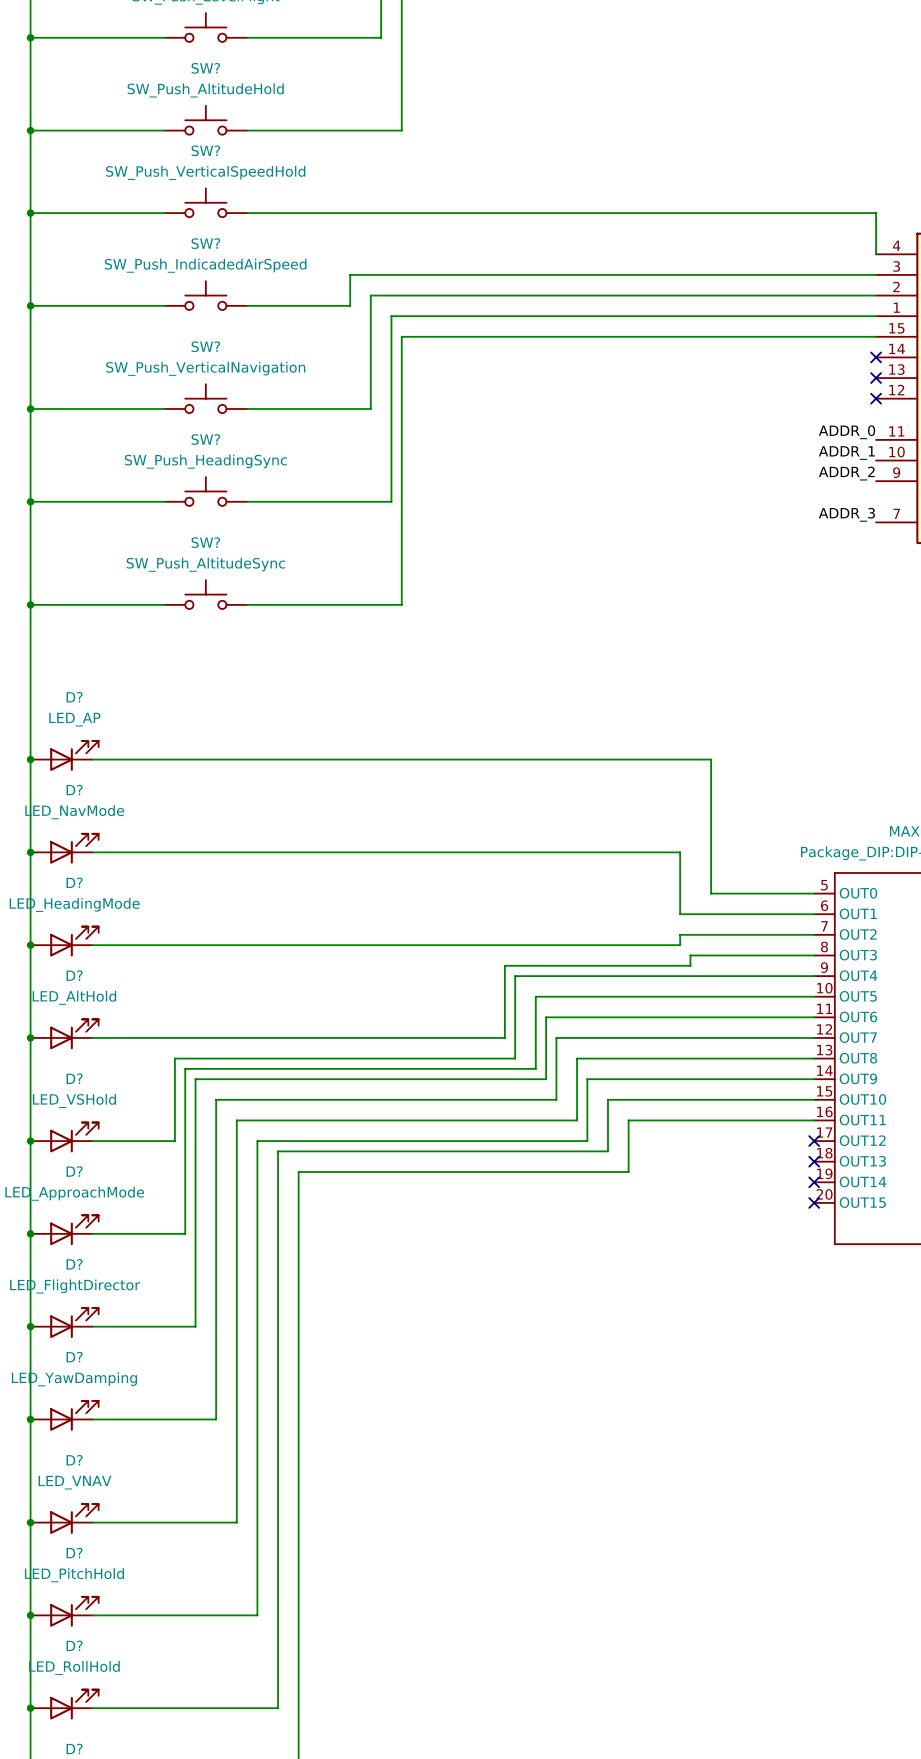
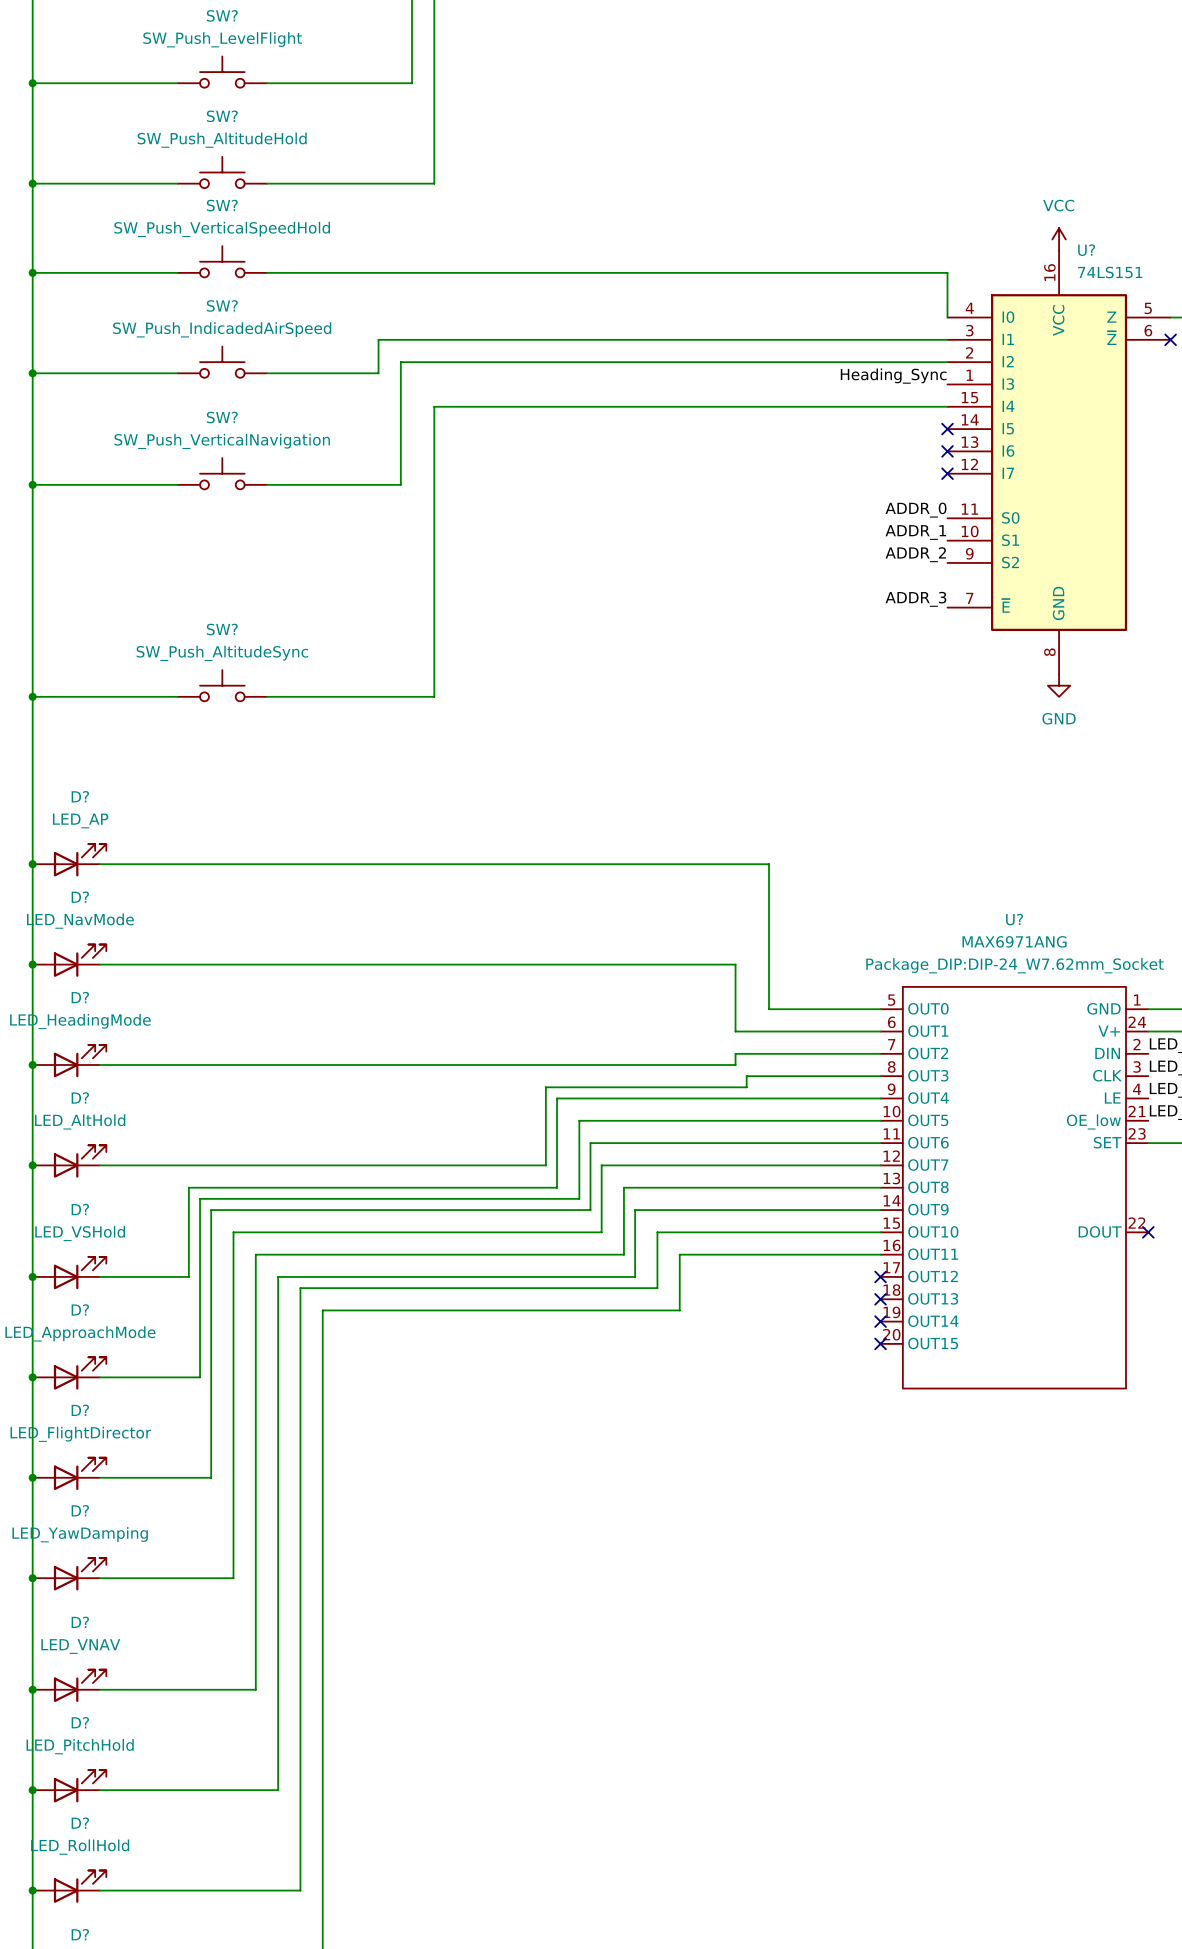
label: none -> Heading_Sync (893, 376)
wire: (876, 316) (391, 316) (391, 501) (247, 501) -> none
SW?: SW_Push_HeadingSync (205, 491) -> none
wire: (30, 501) (164, 501) -> none
junction: (30, 501) -> none

